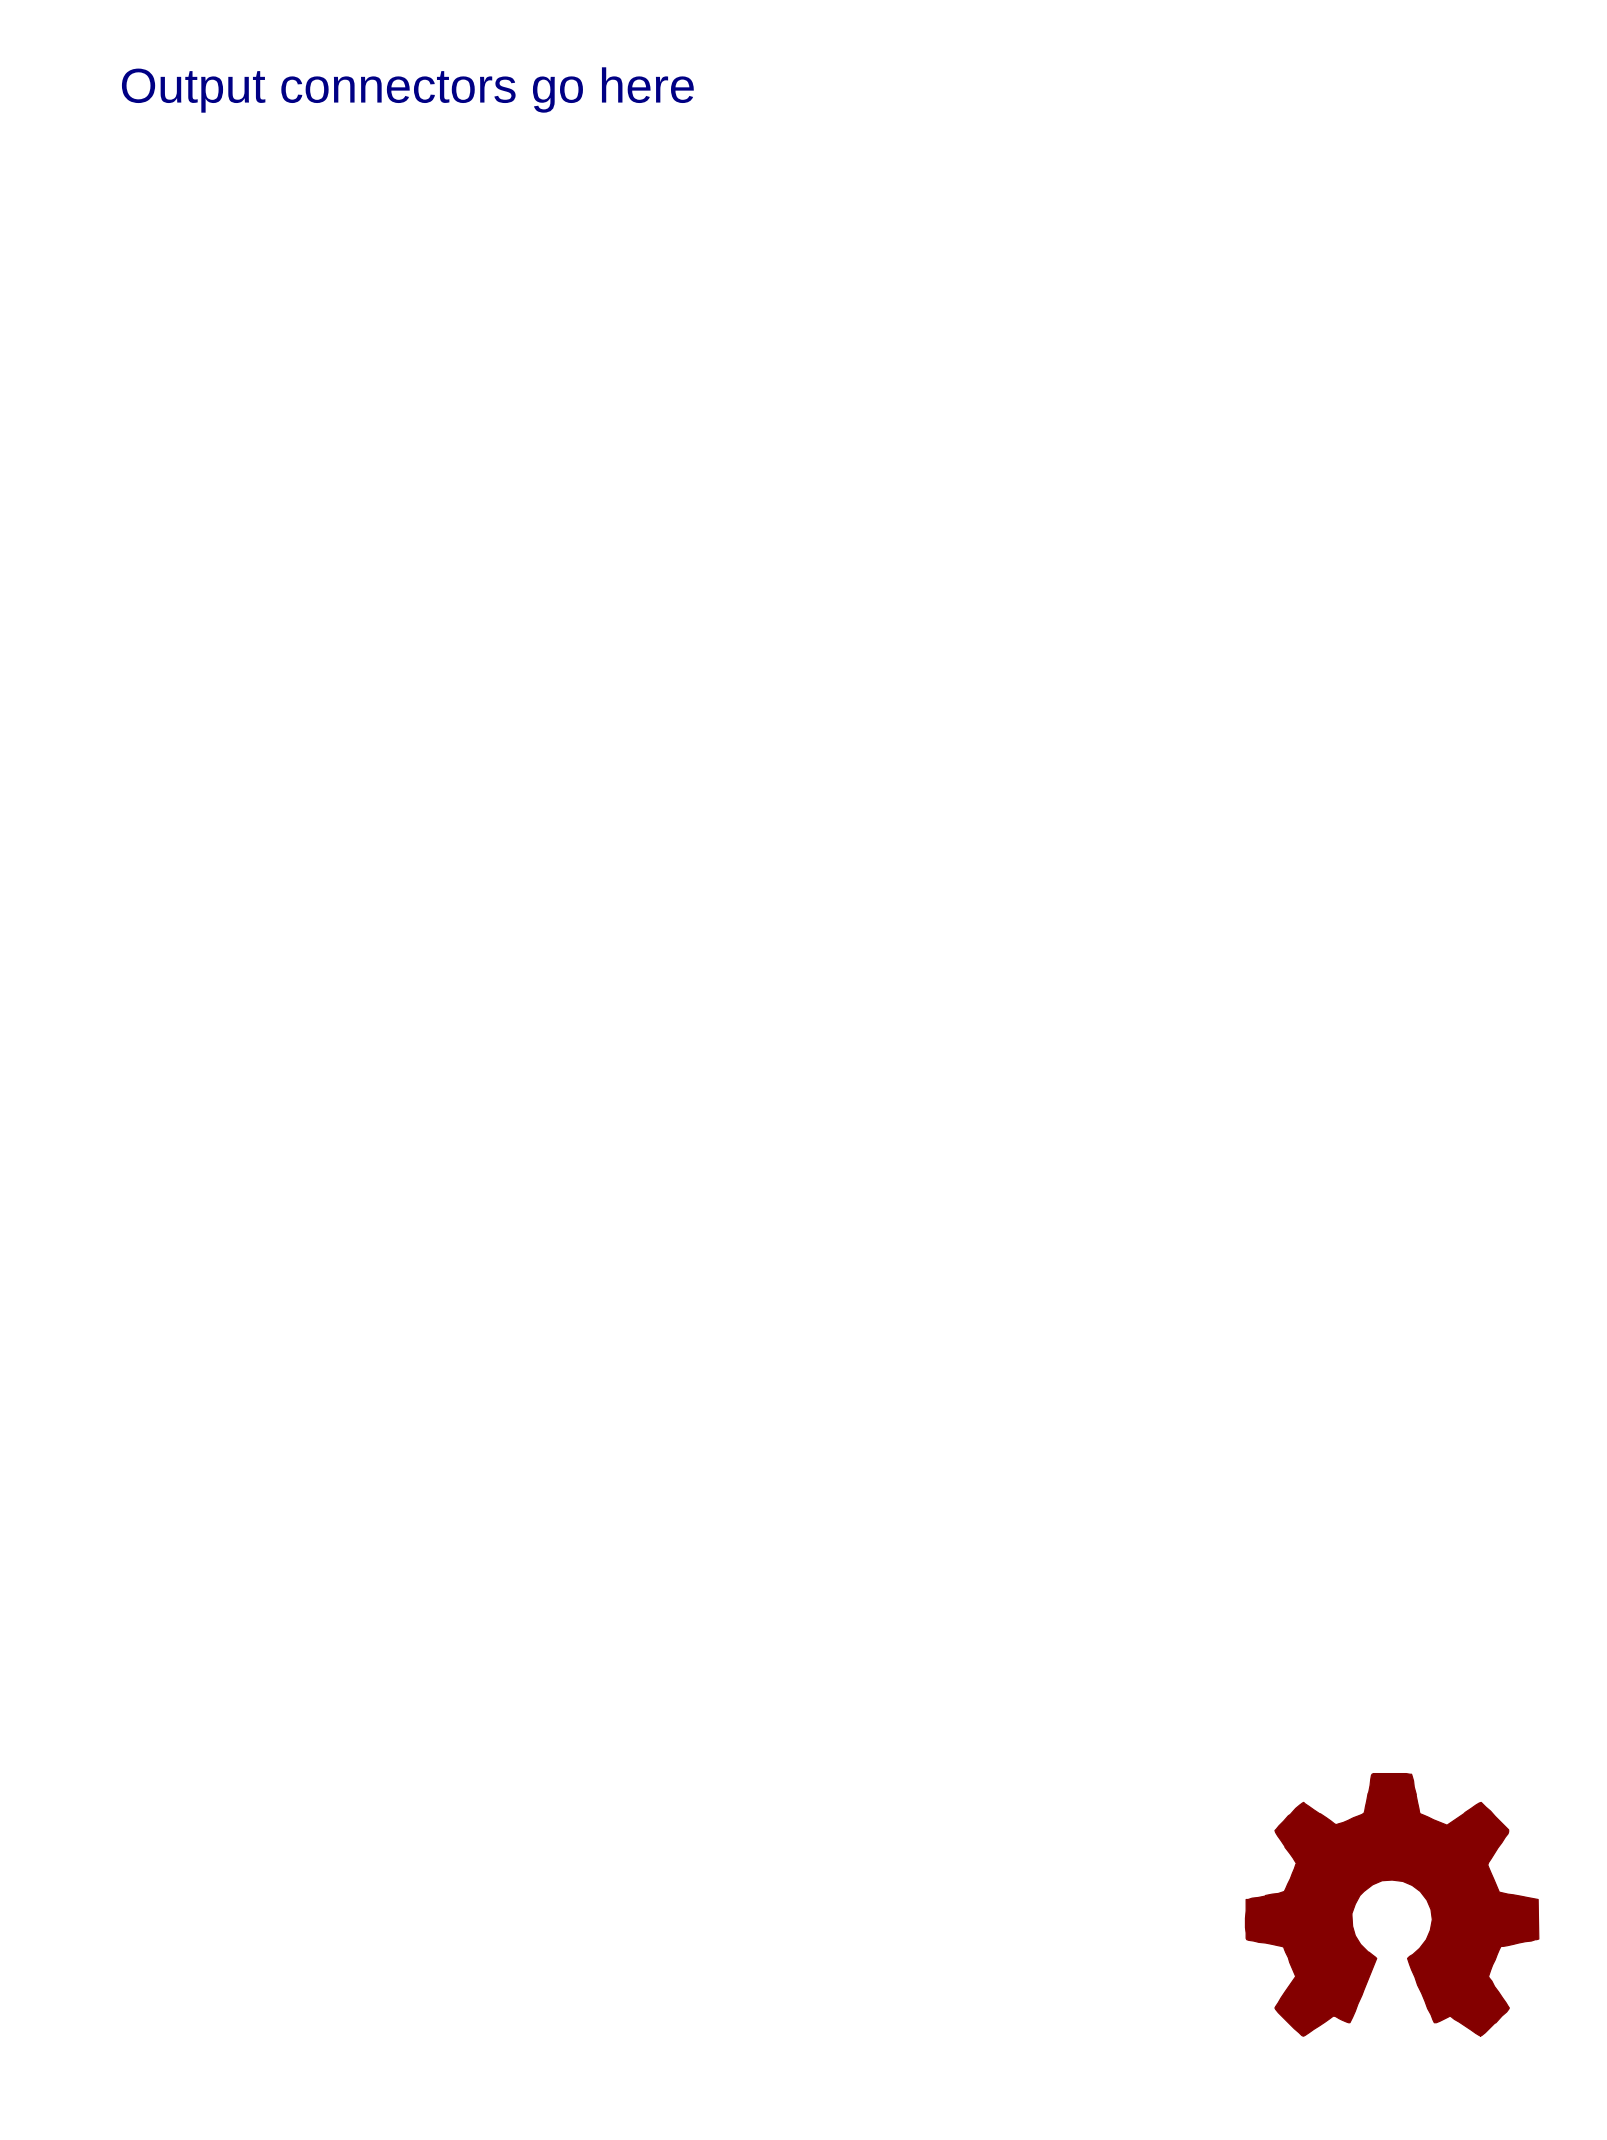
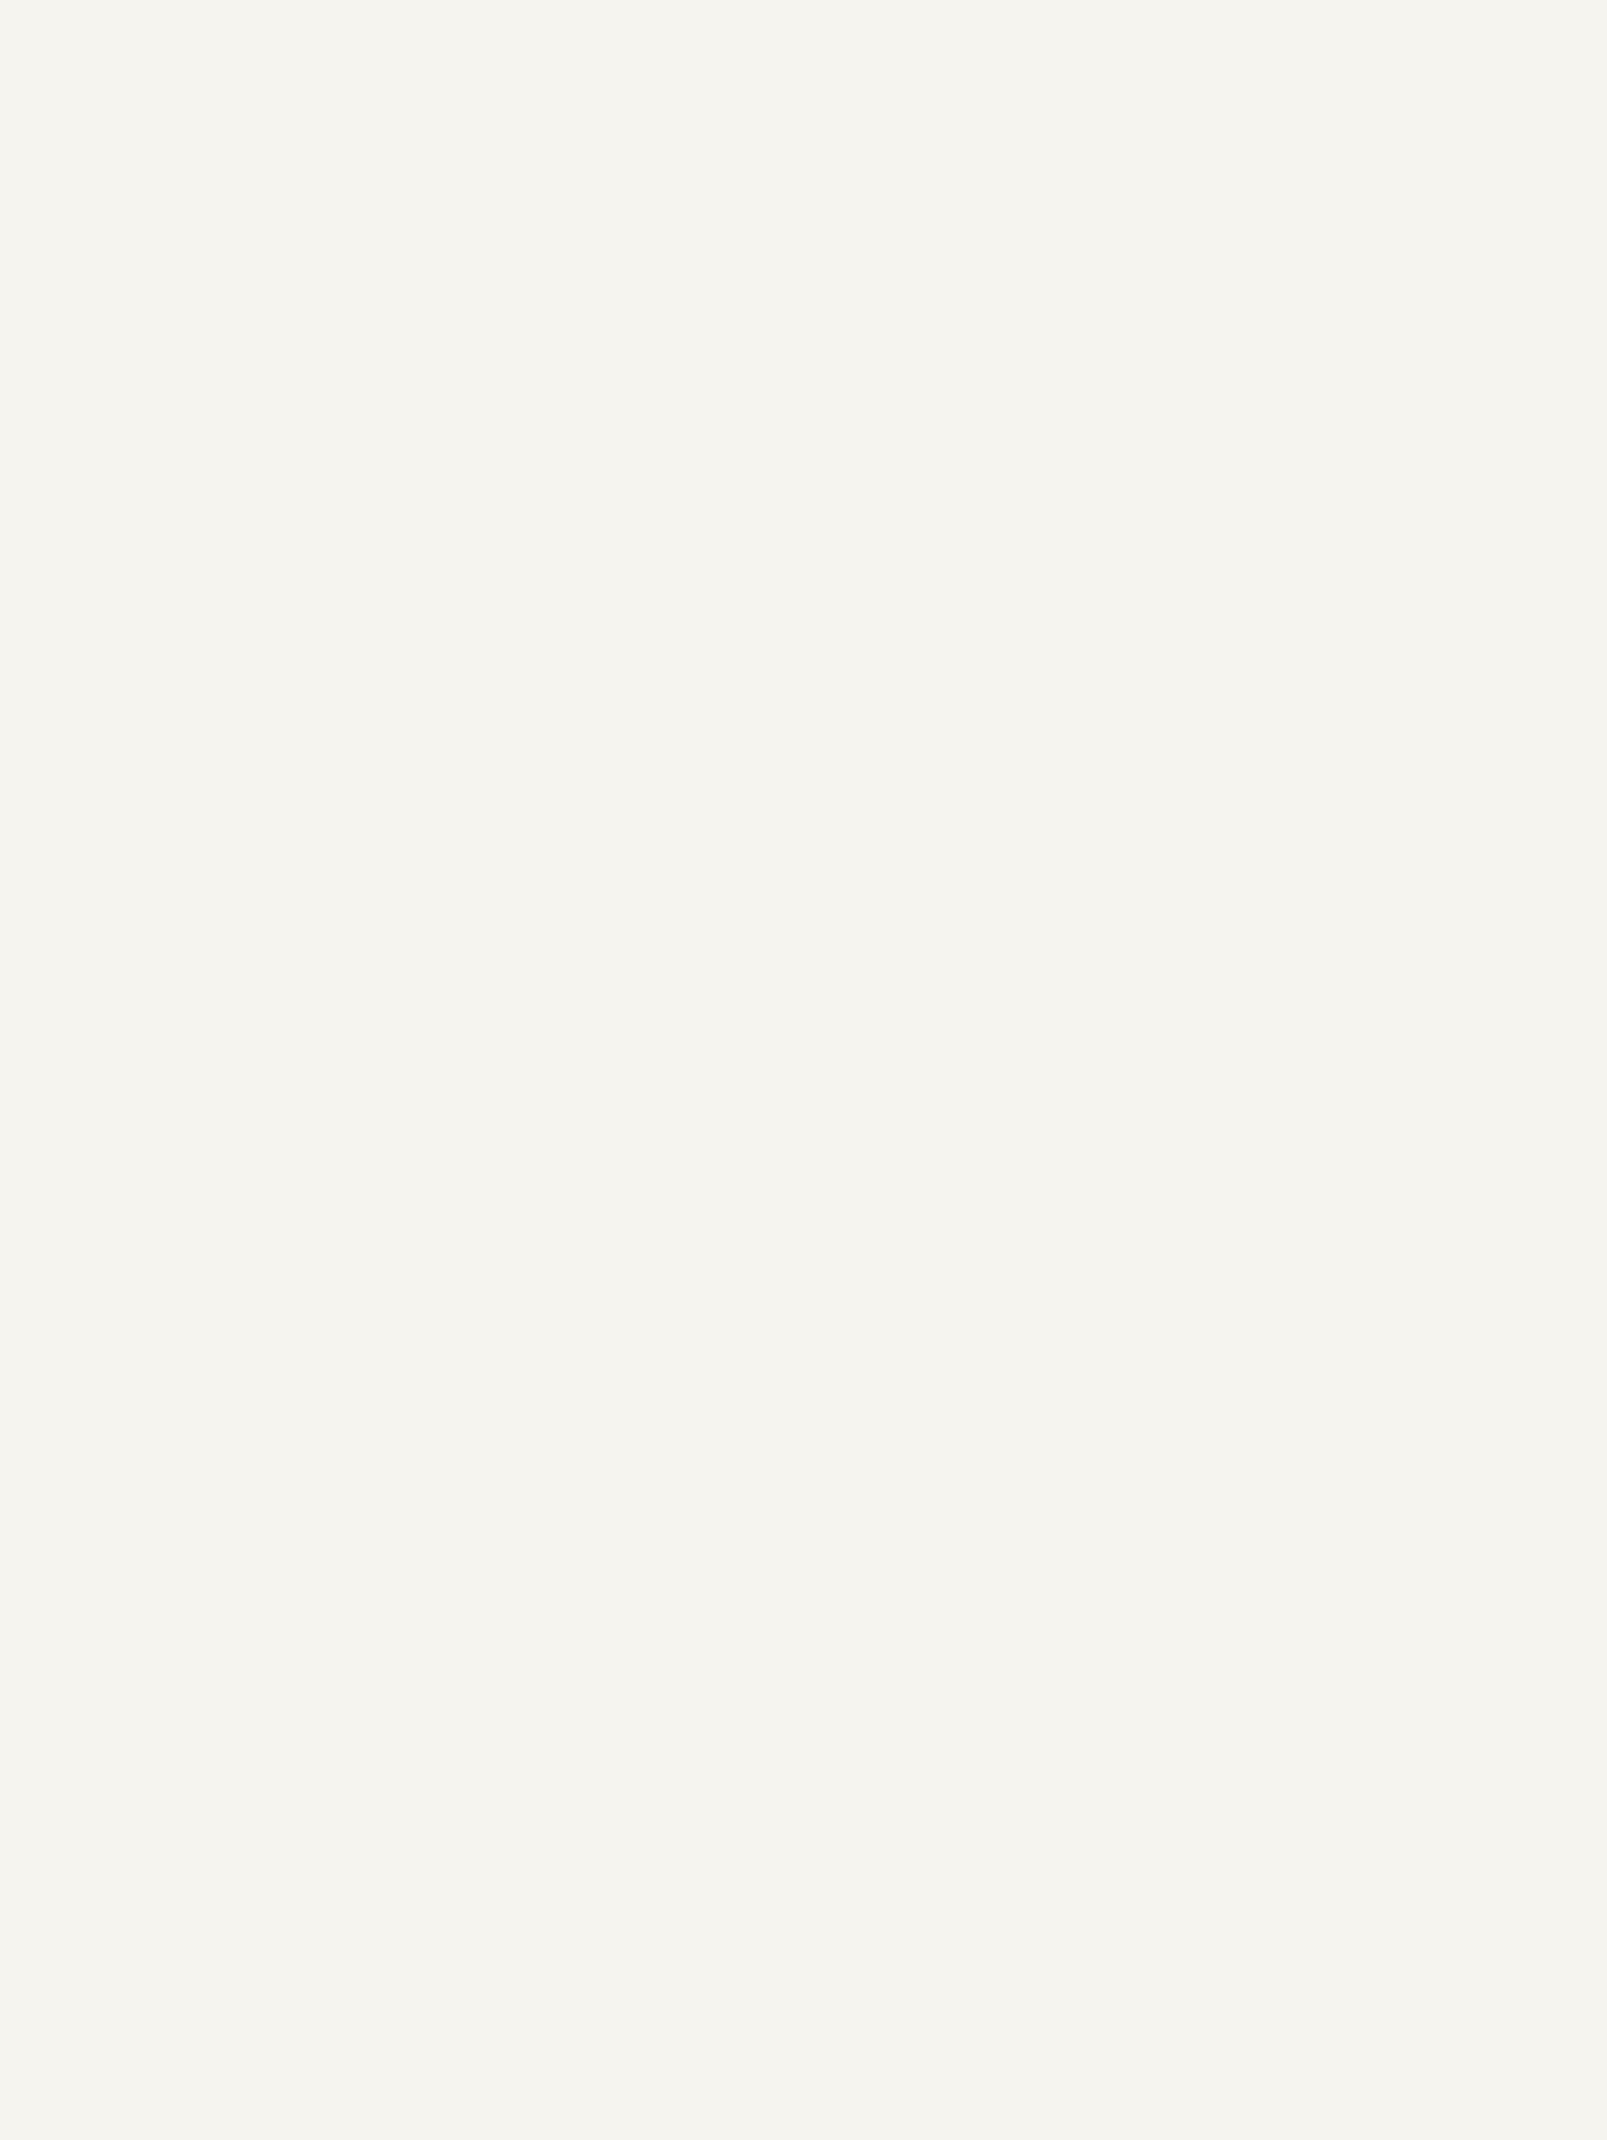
text: Output connectors go here (407, 89) -> none
part: (1392, 1904) -> none

